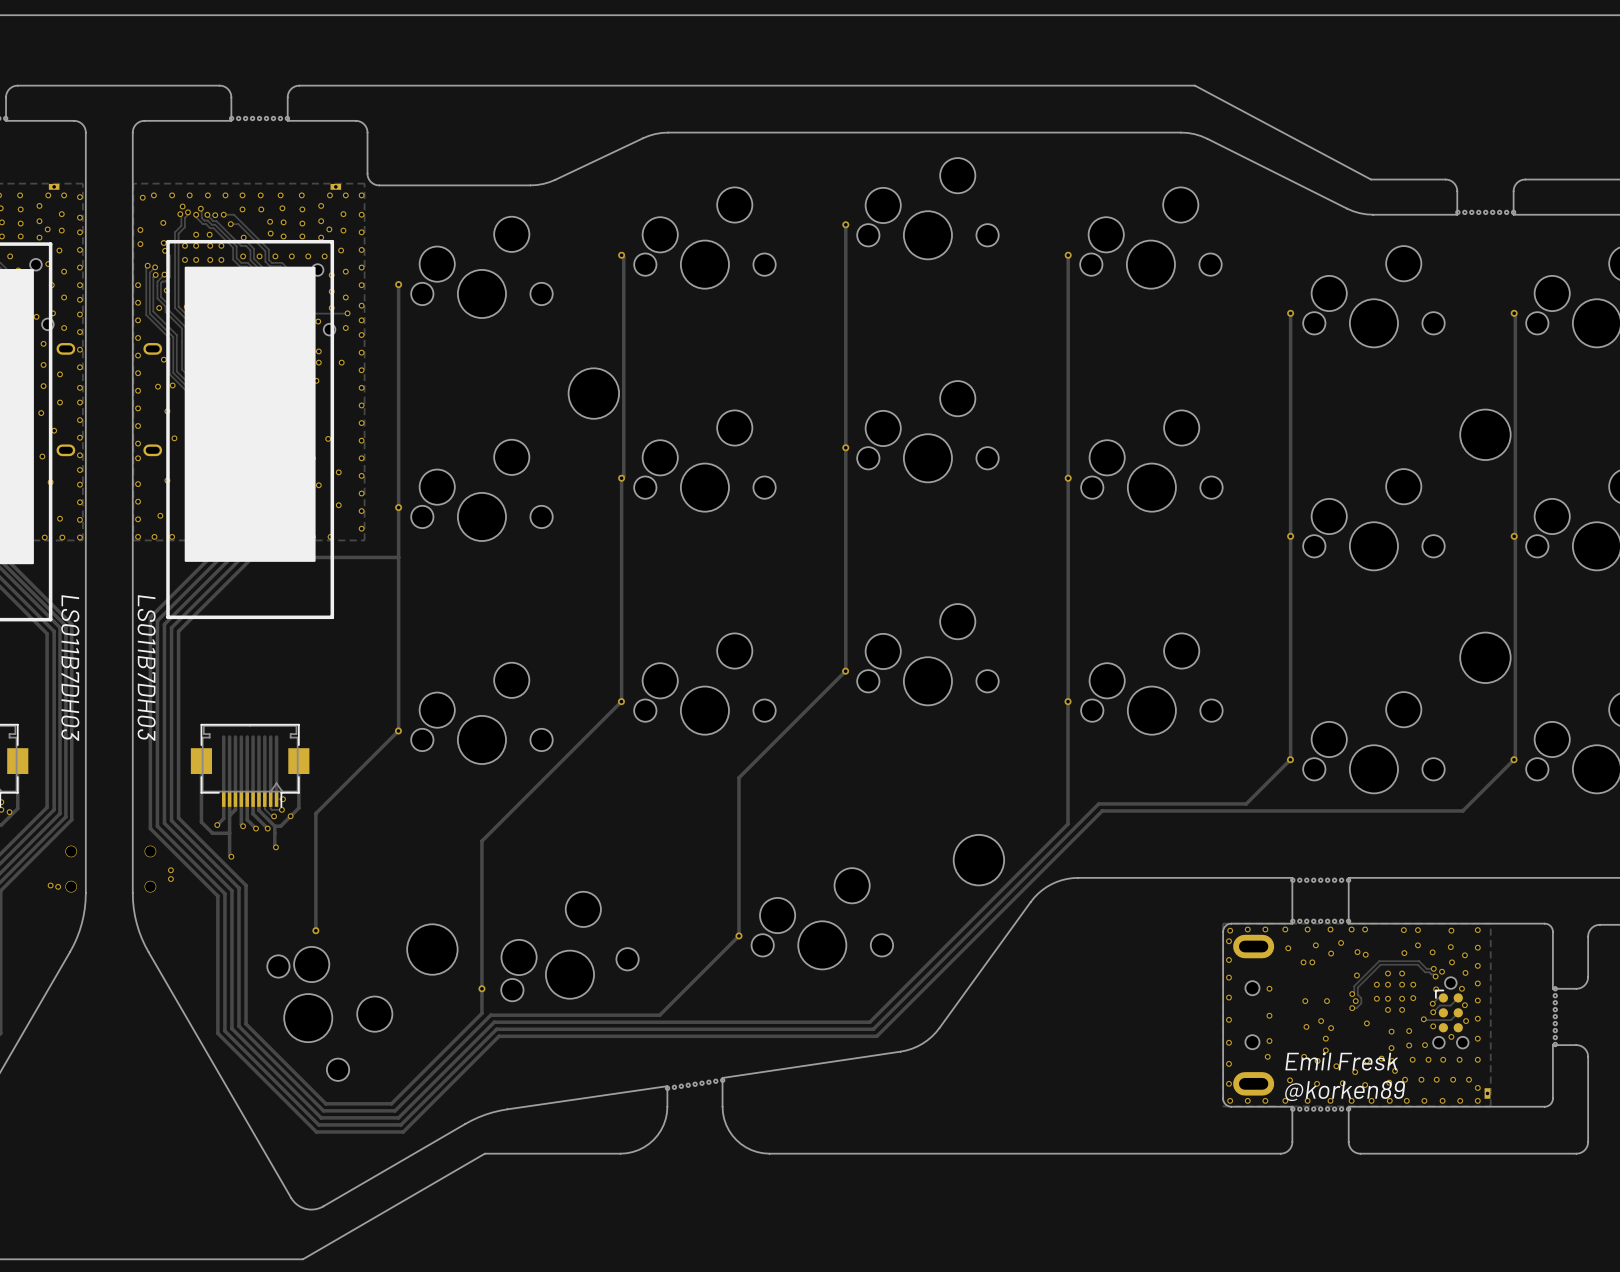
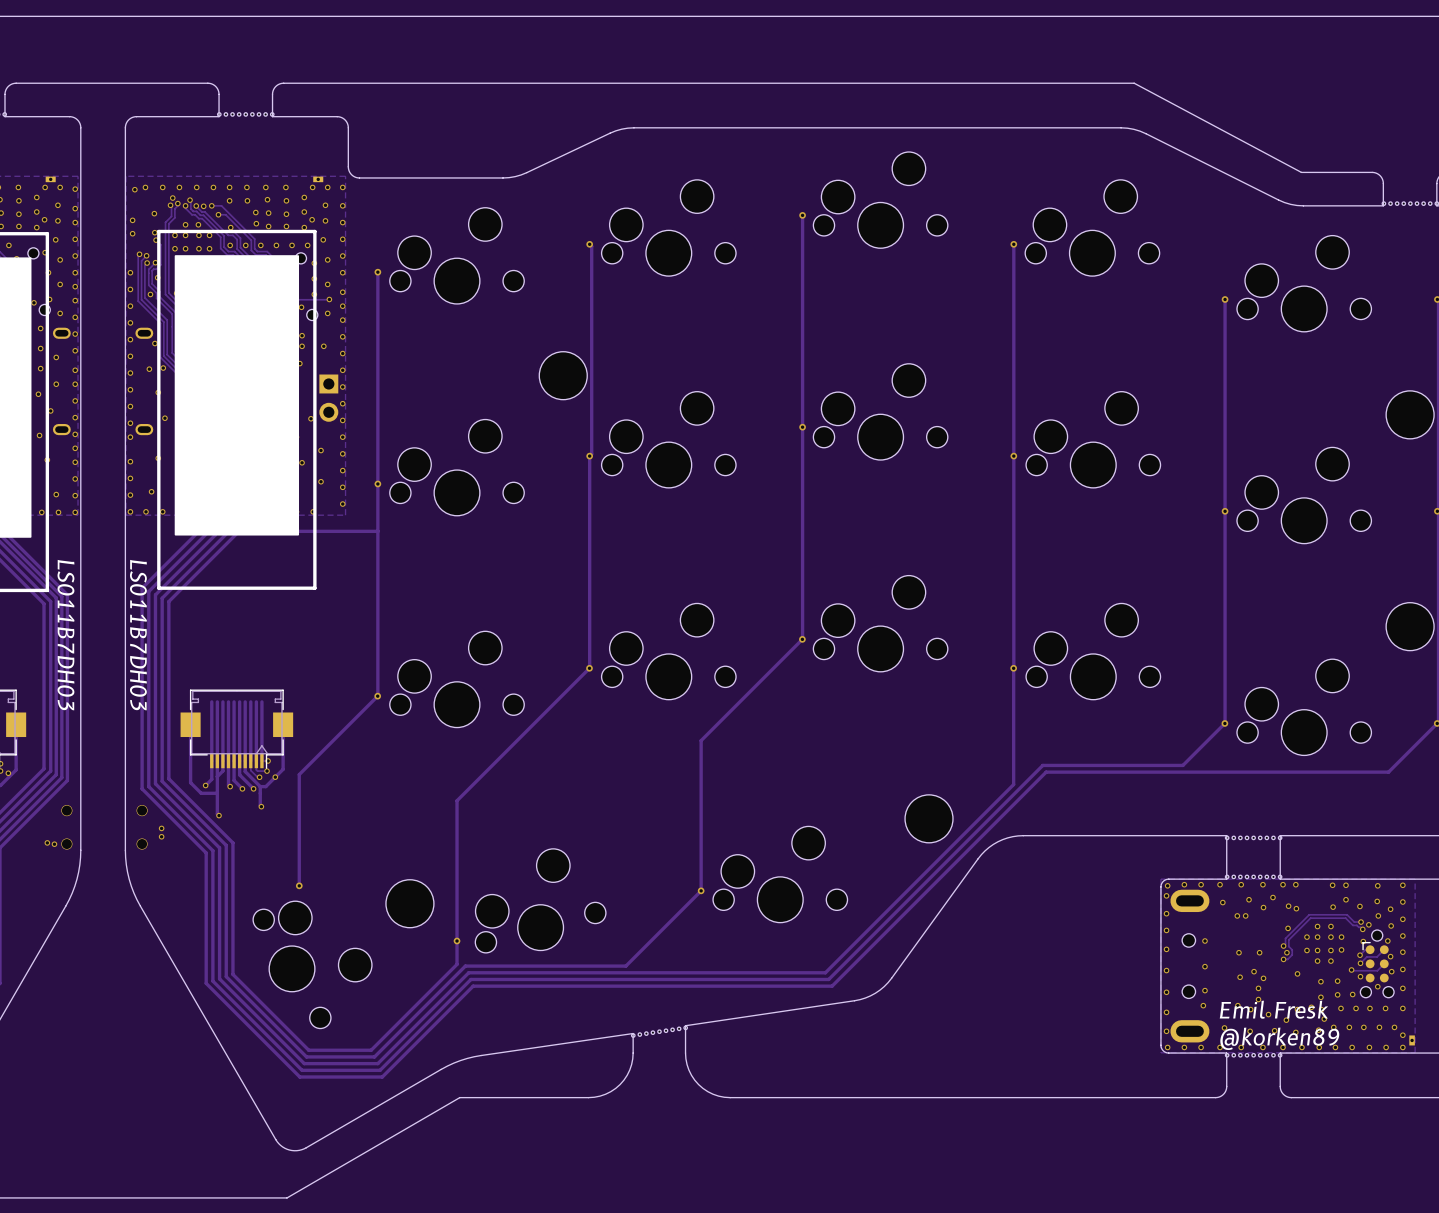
part: none -> (328, 398)

